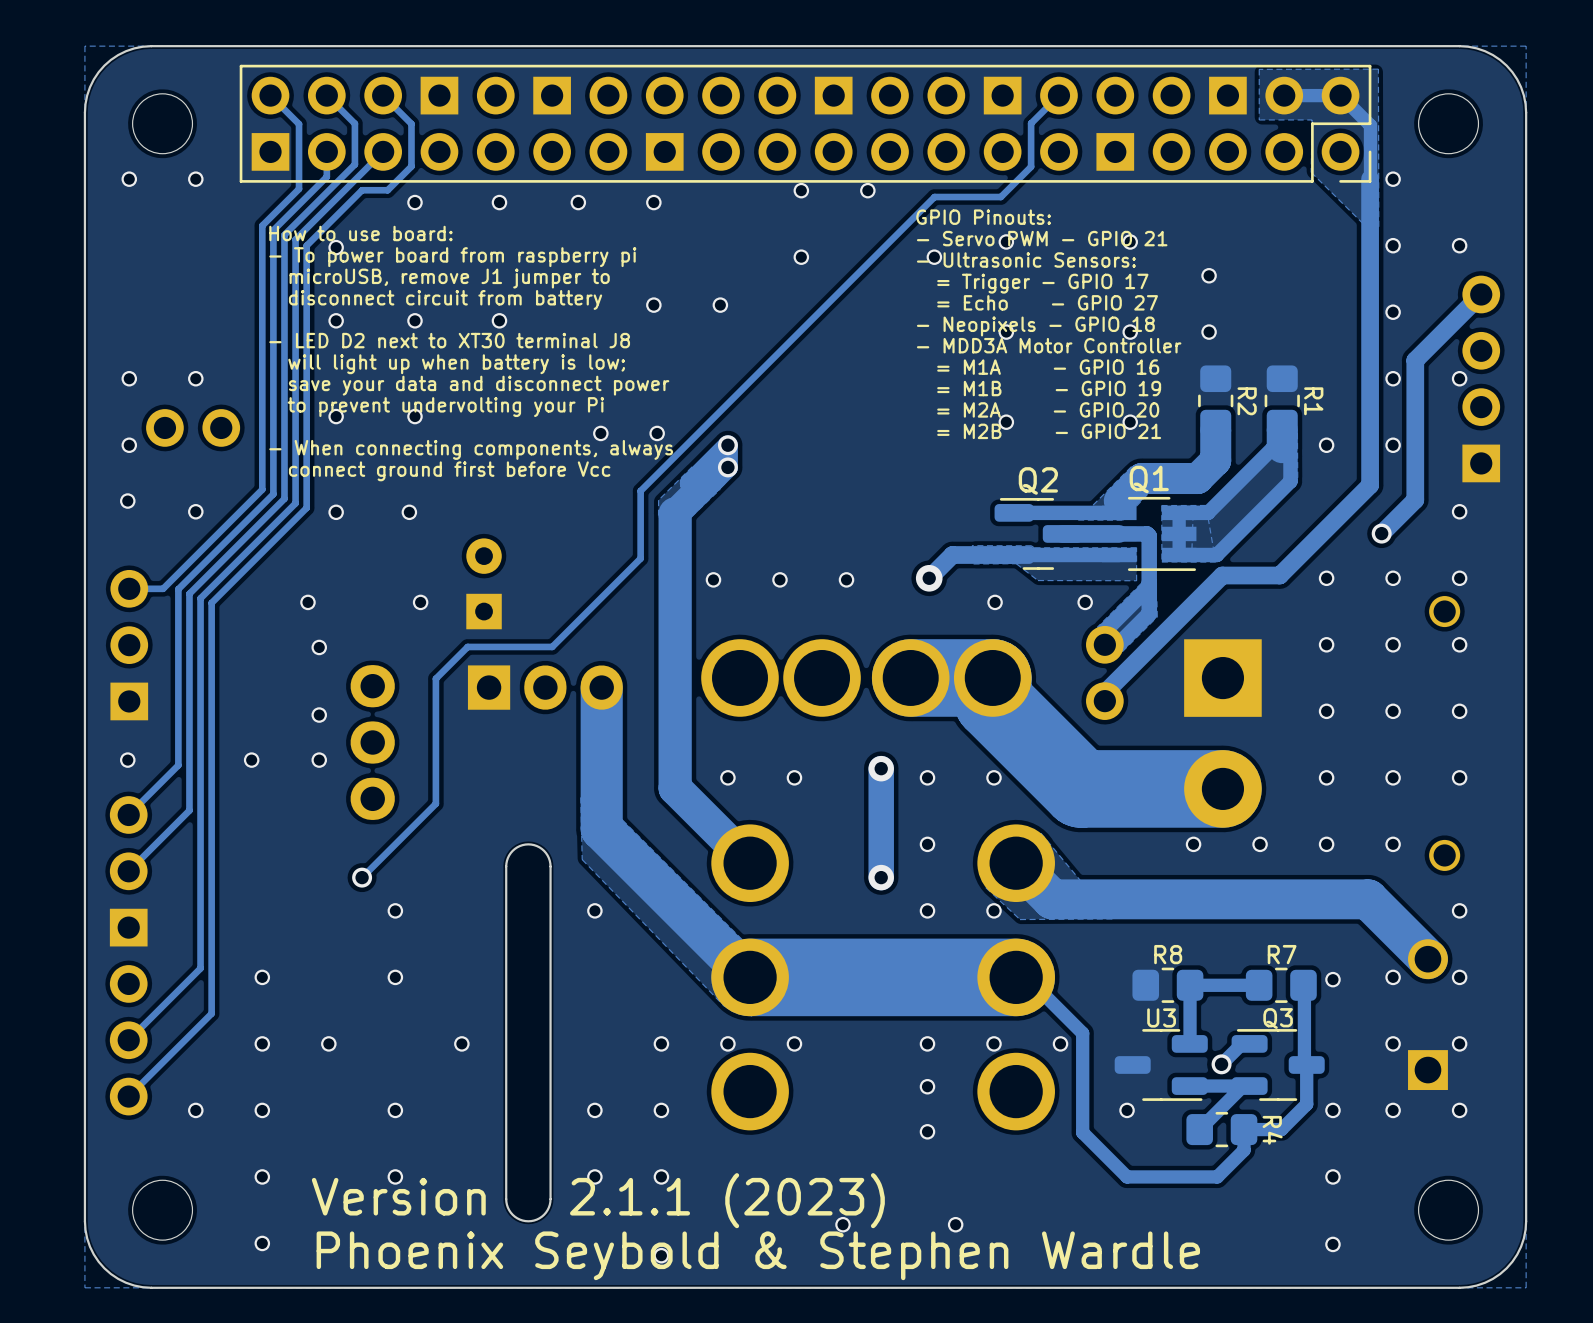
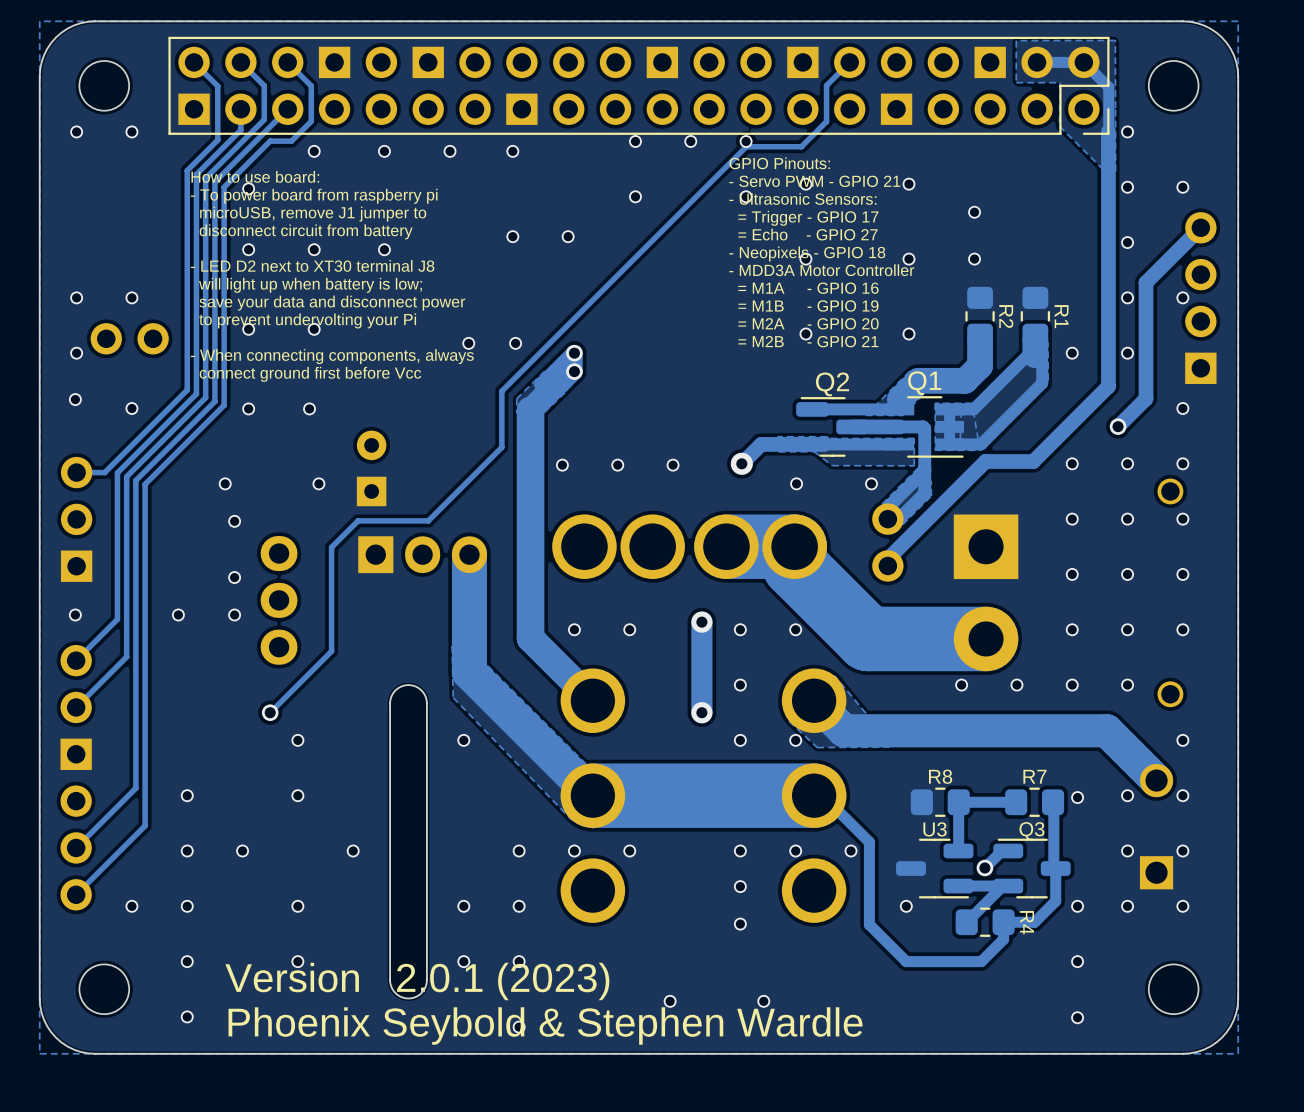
via: none -> (746, 141)
text: Version 2.1.1 (2023) (598, 1200) -> Version 2.0.1 (2023) (417, 981)

